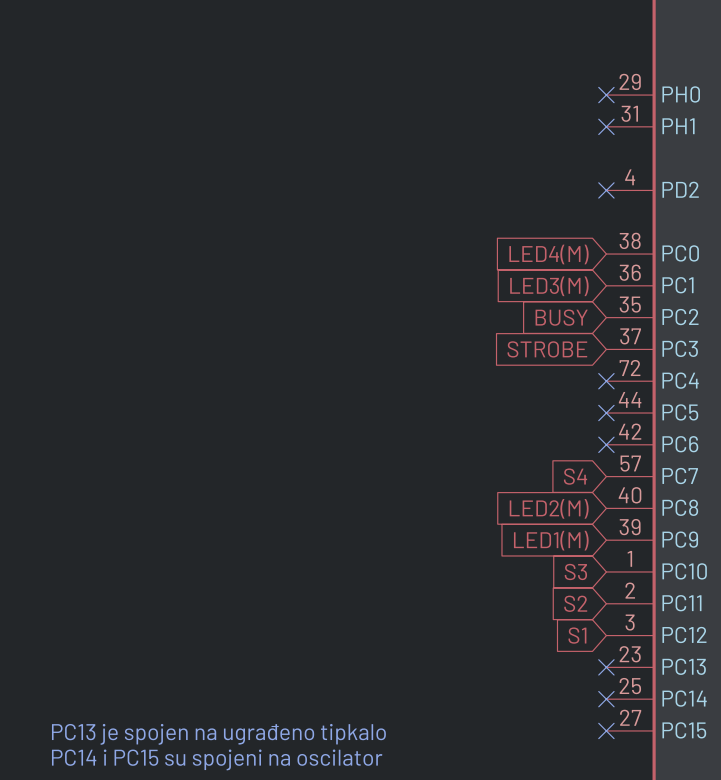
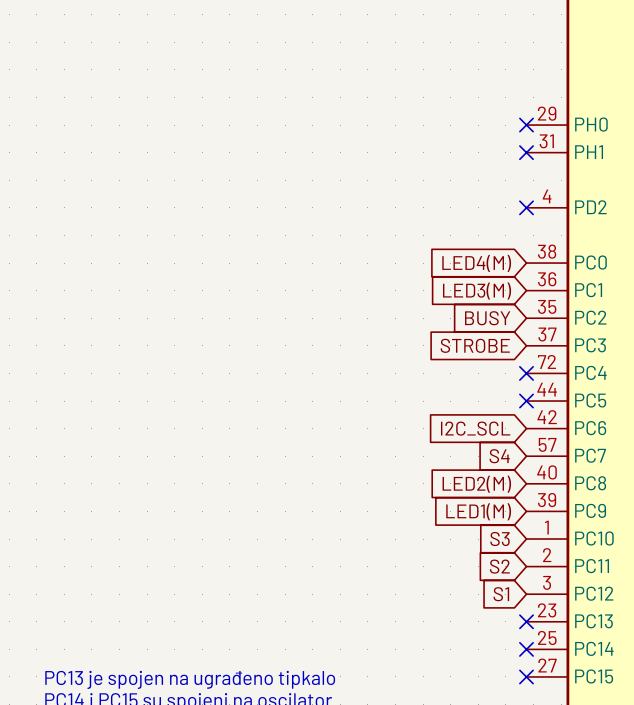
global label: none -> I2C_SCL (475, 428)
no-connect mark: (606, 444) -> none

